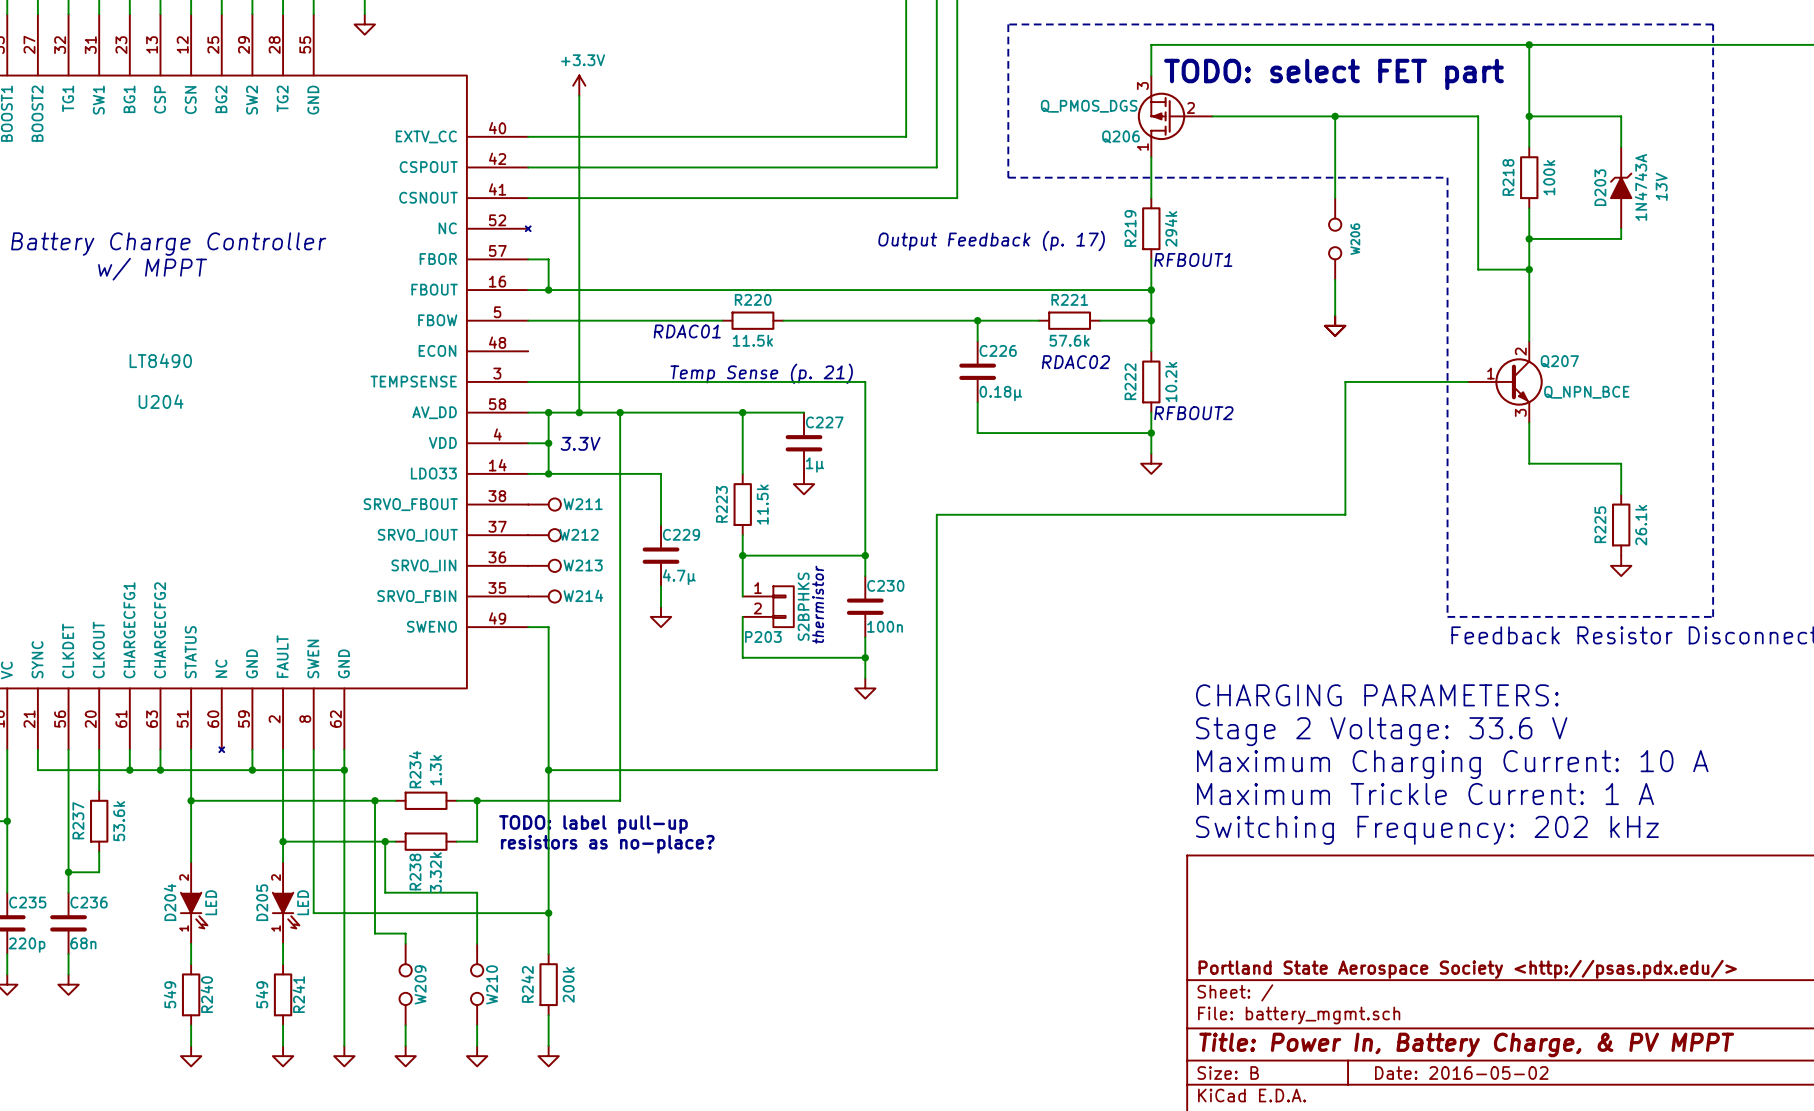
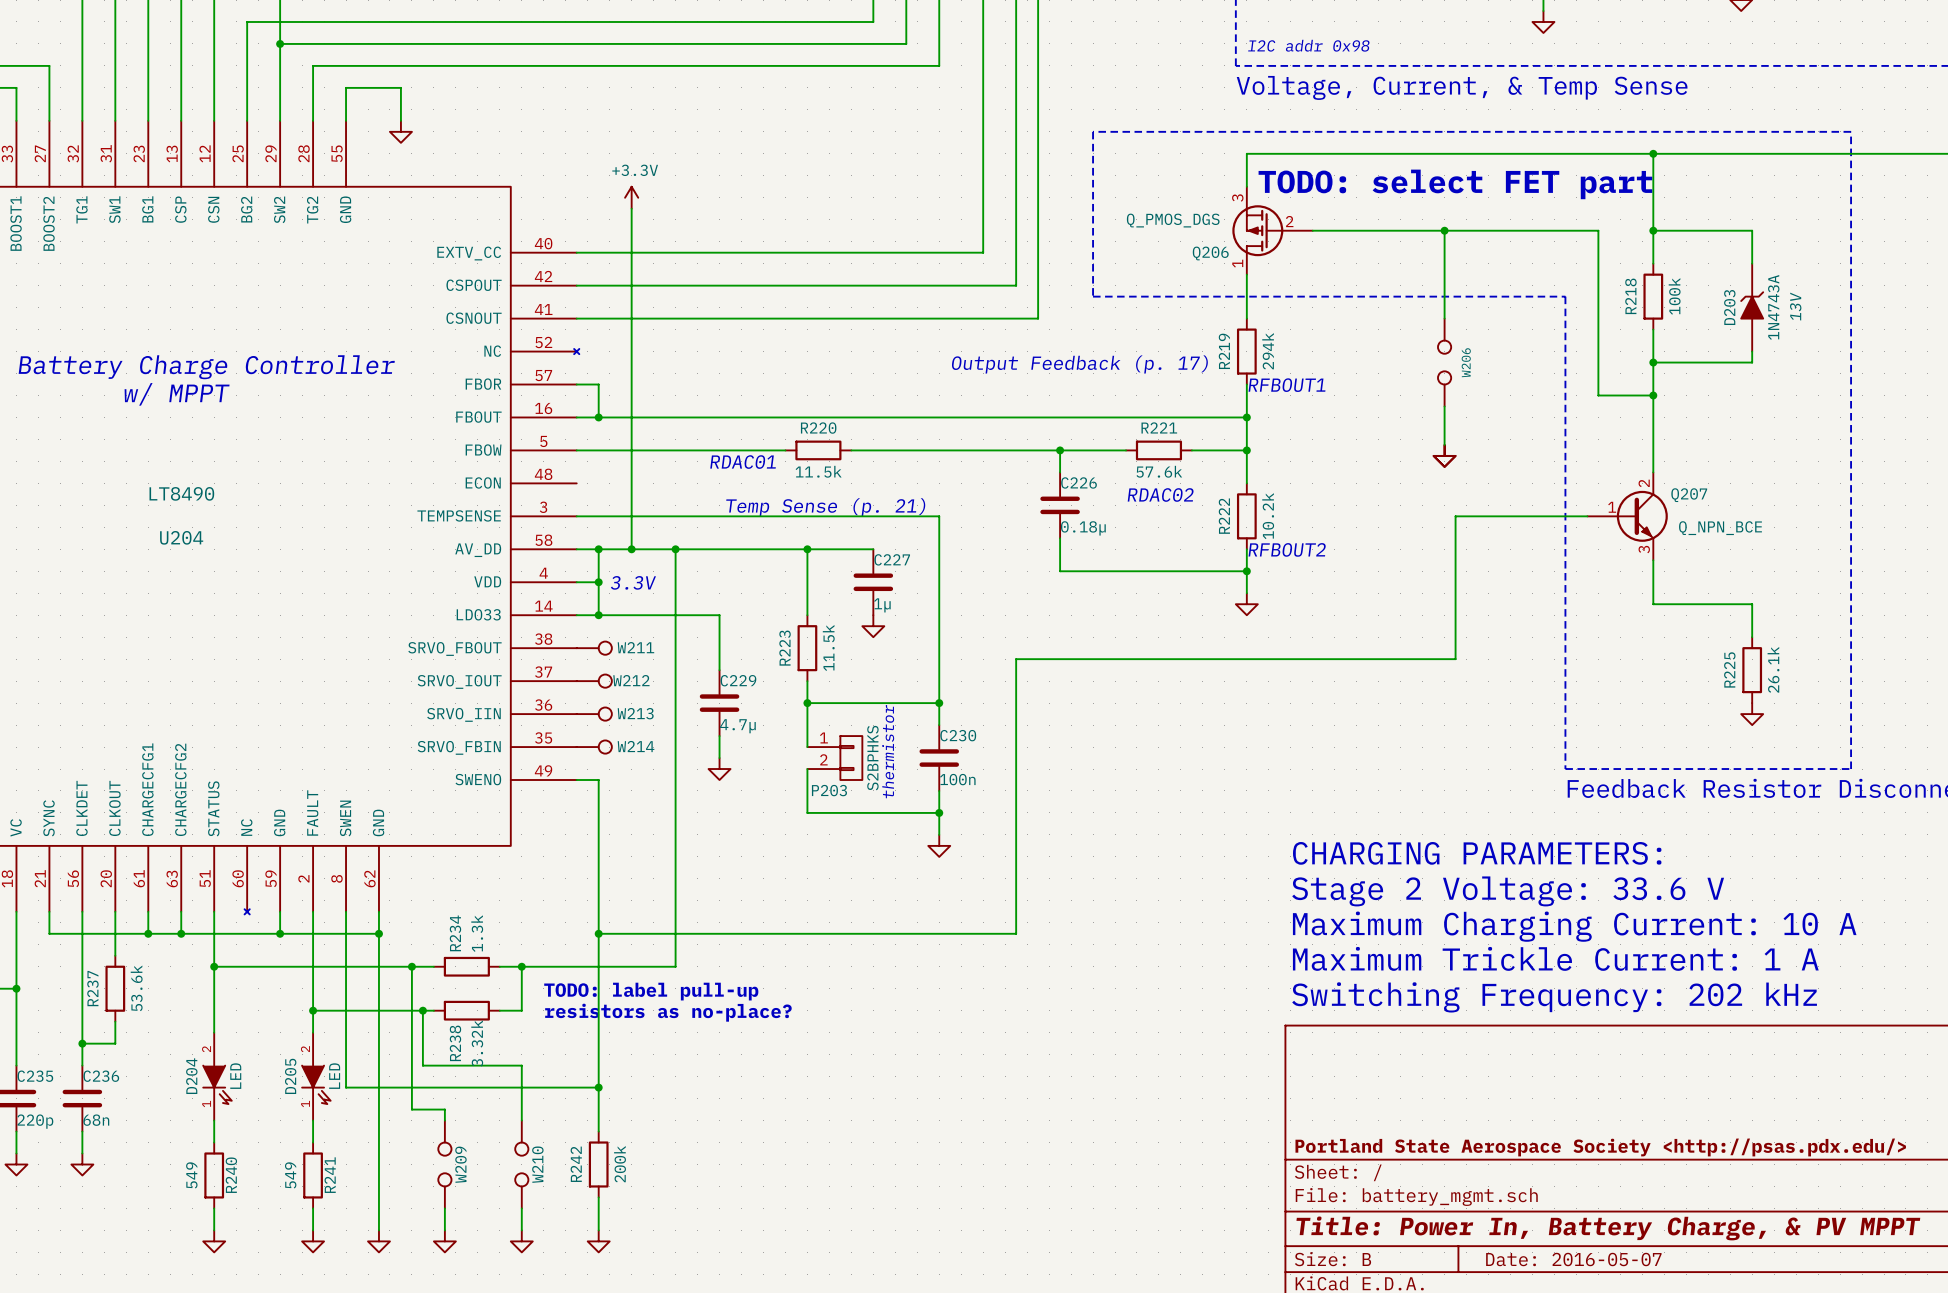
title block: Date: 2016-05-02 (1461, 1072) -> Date: 2016-05-07 (1573, 1259)

